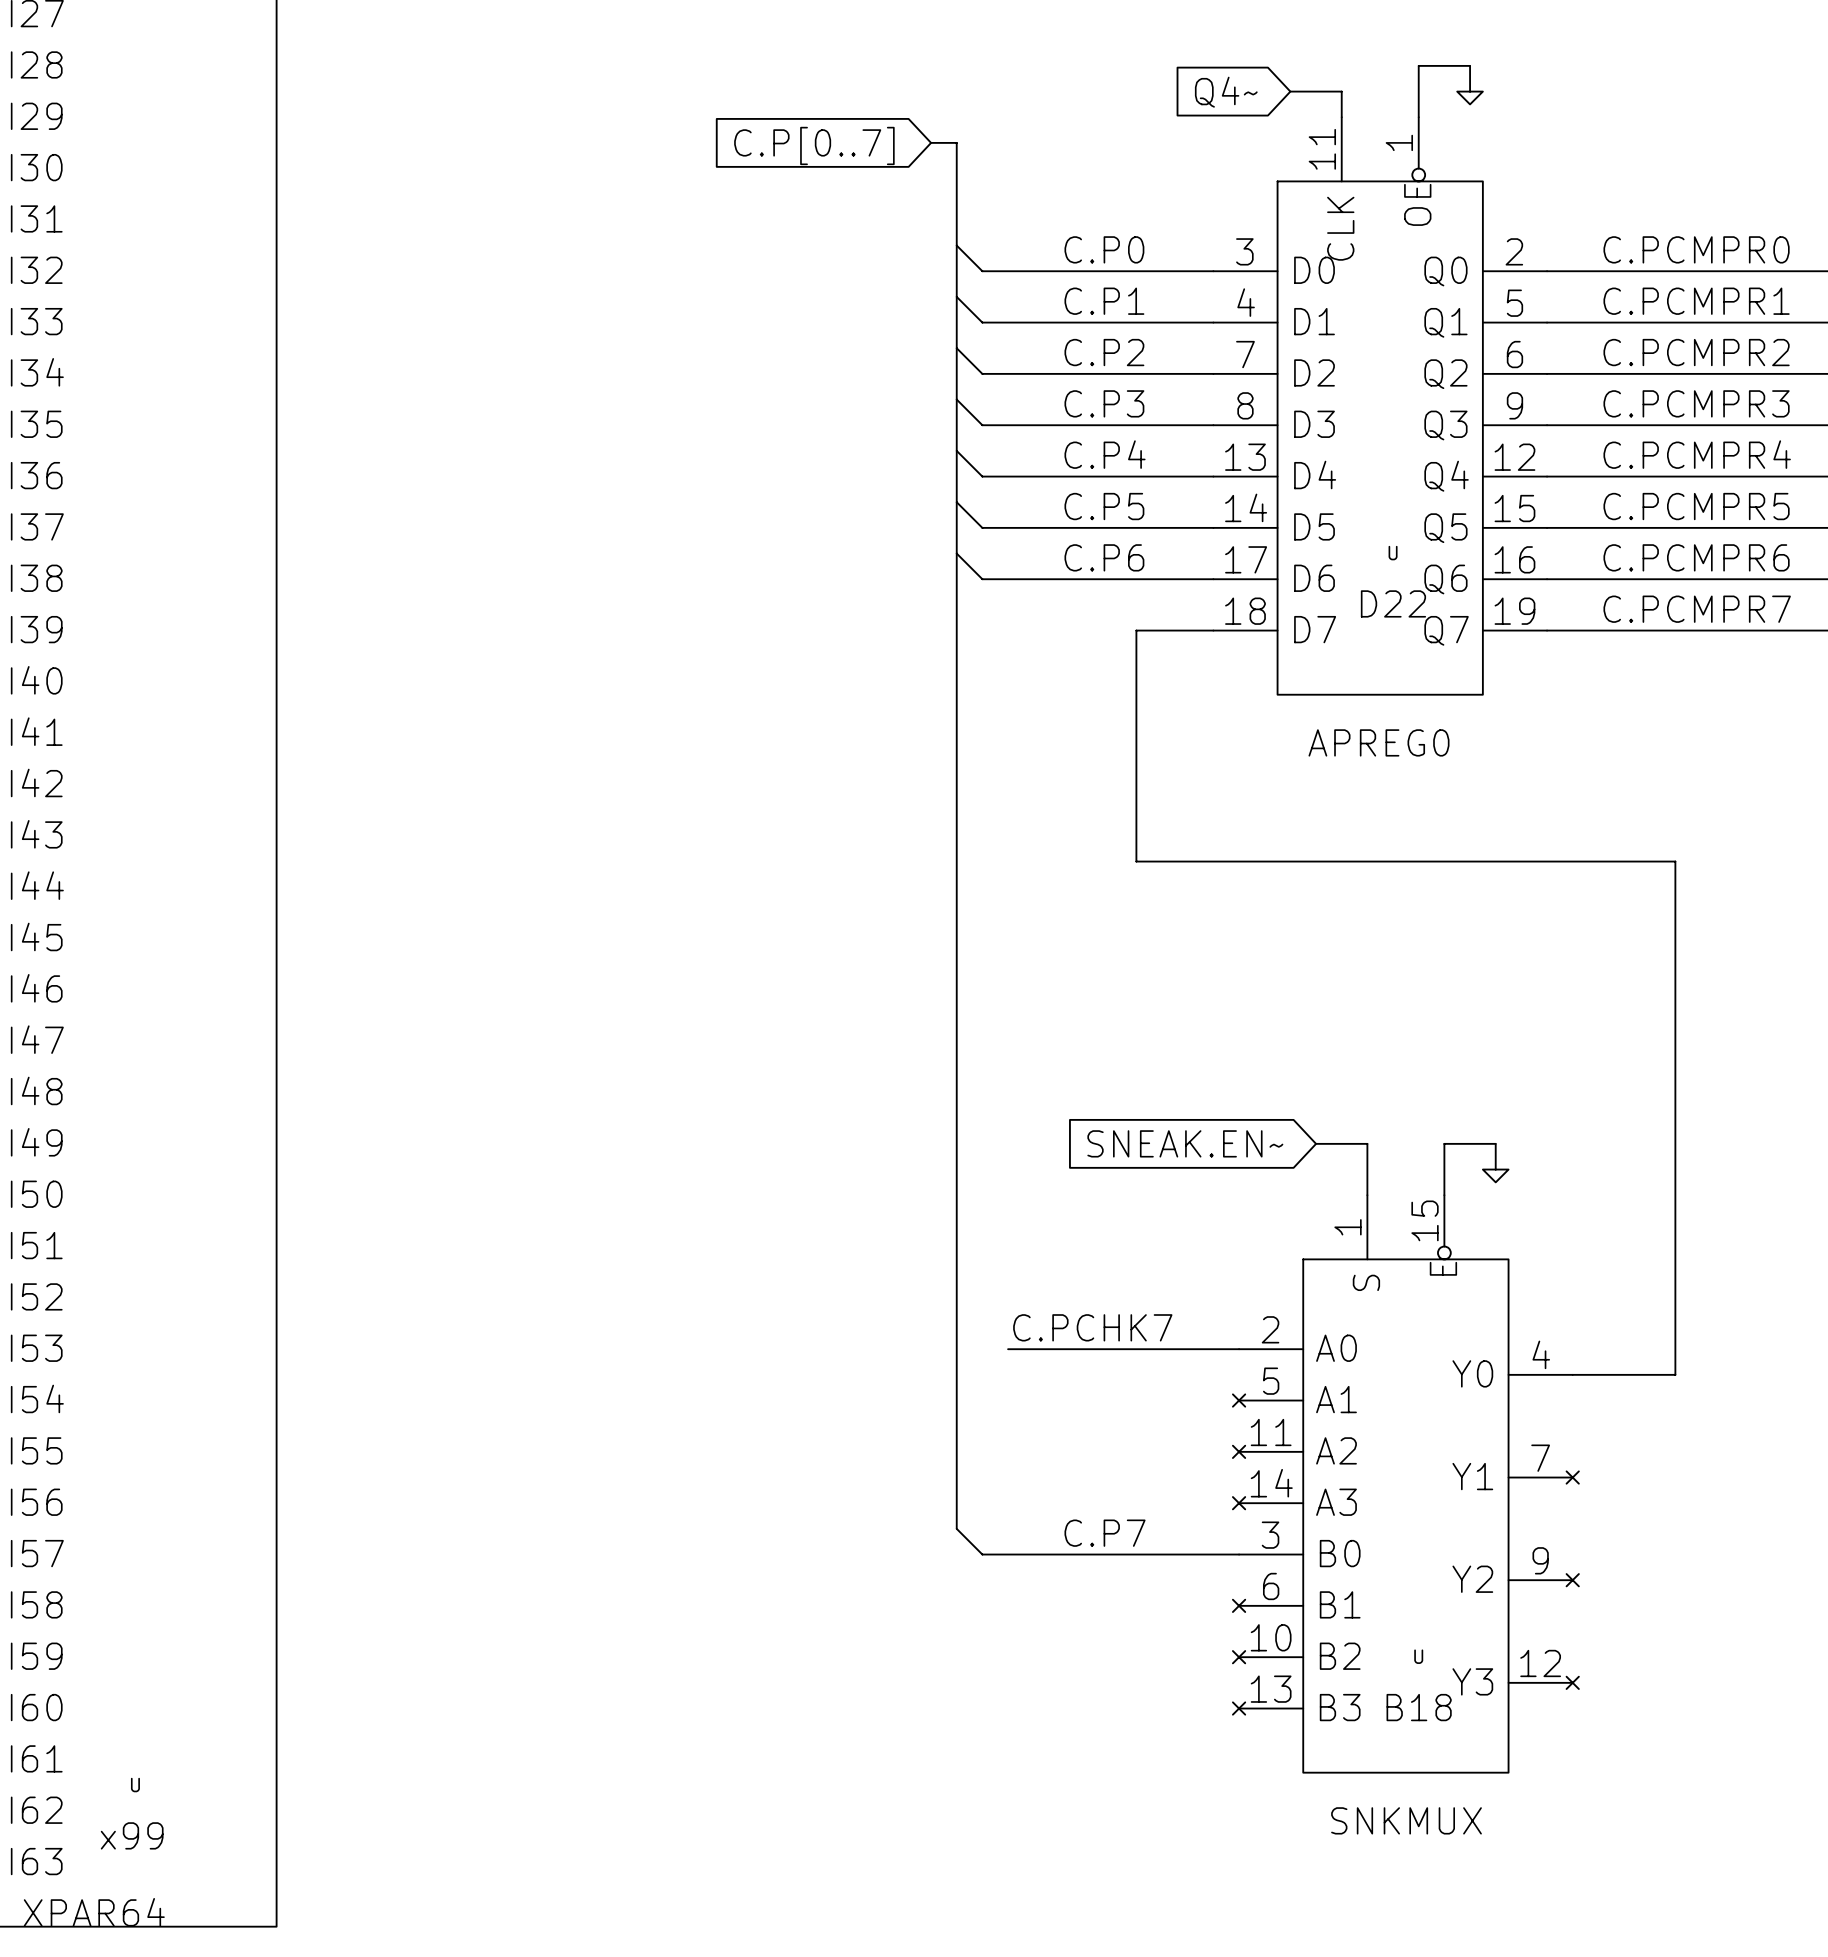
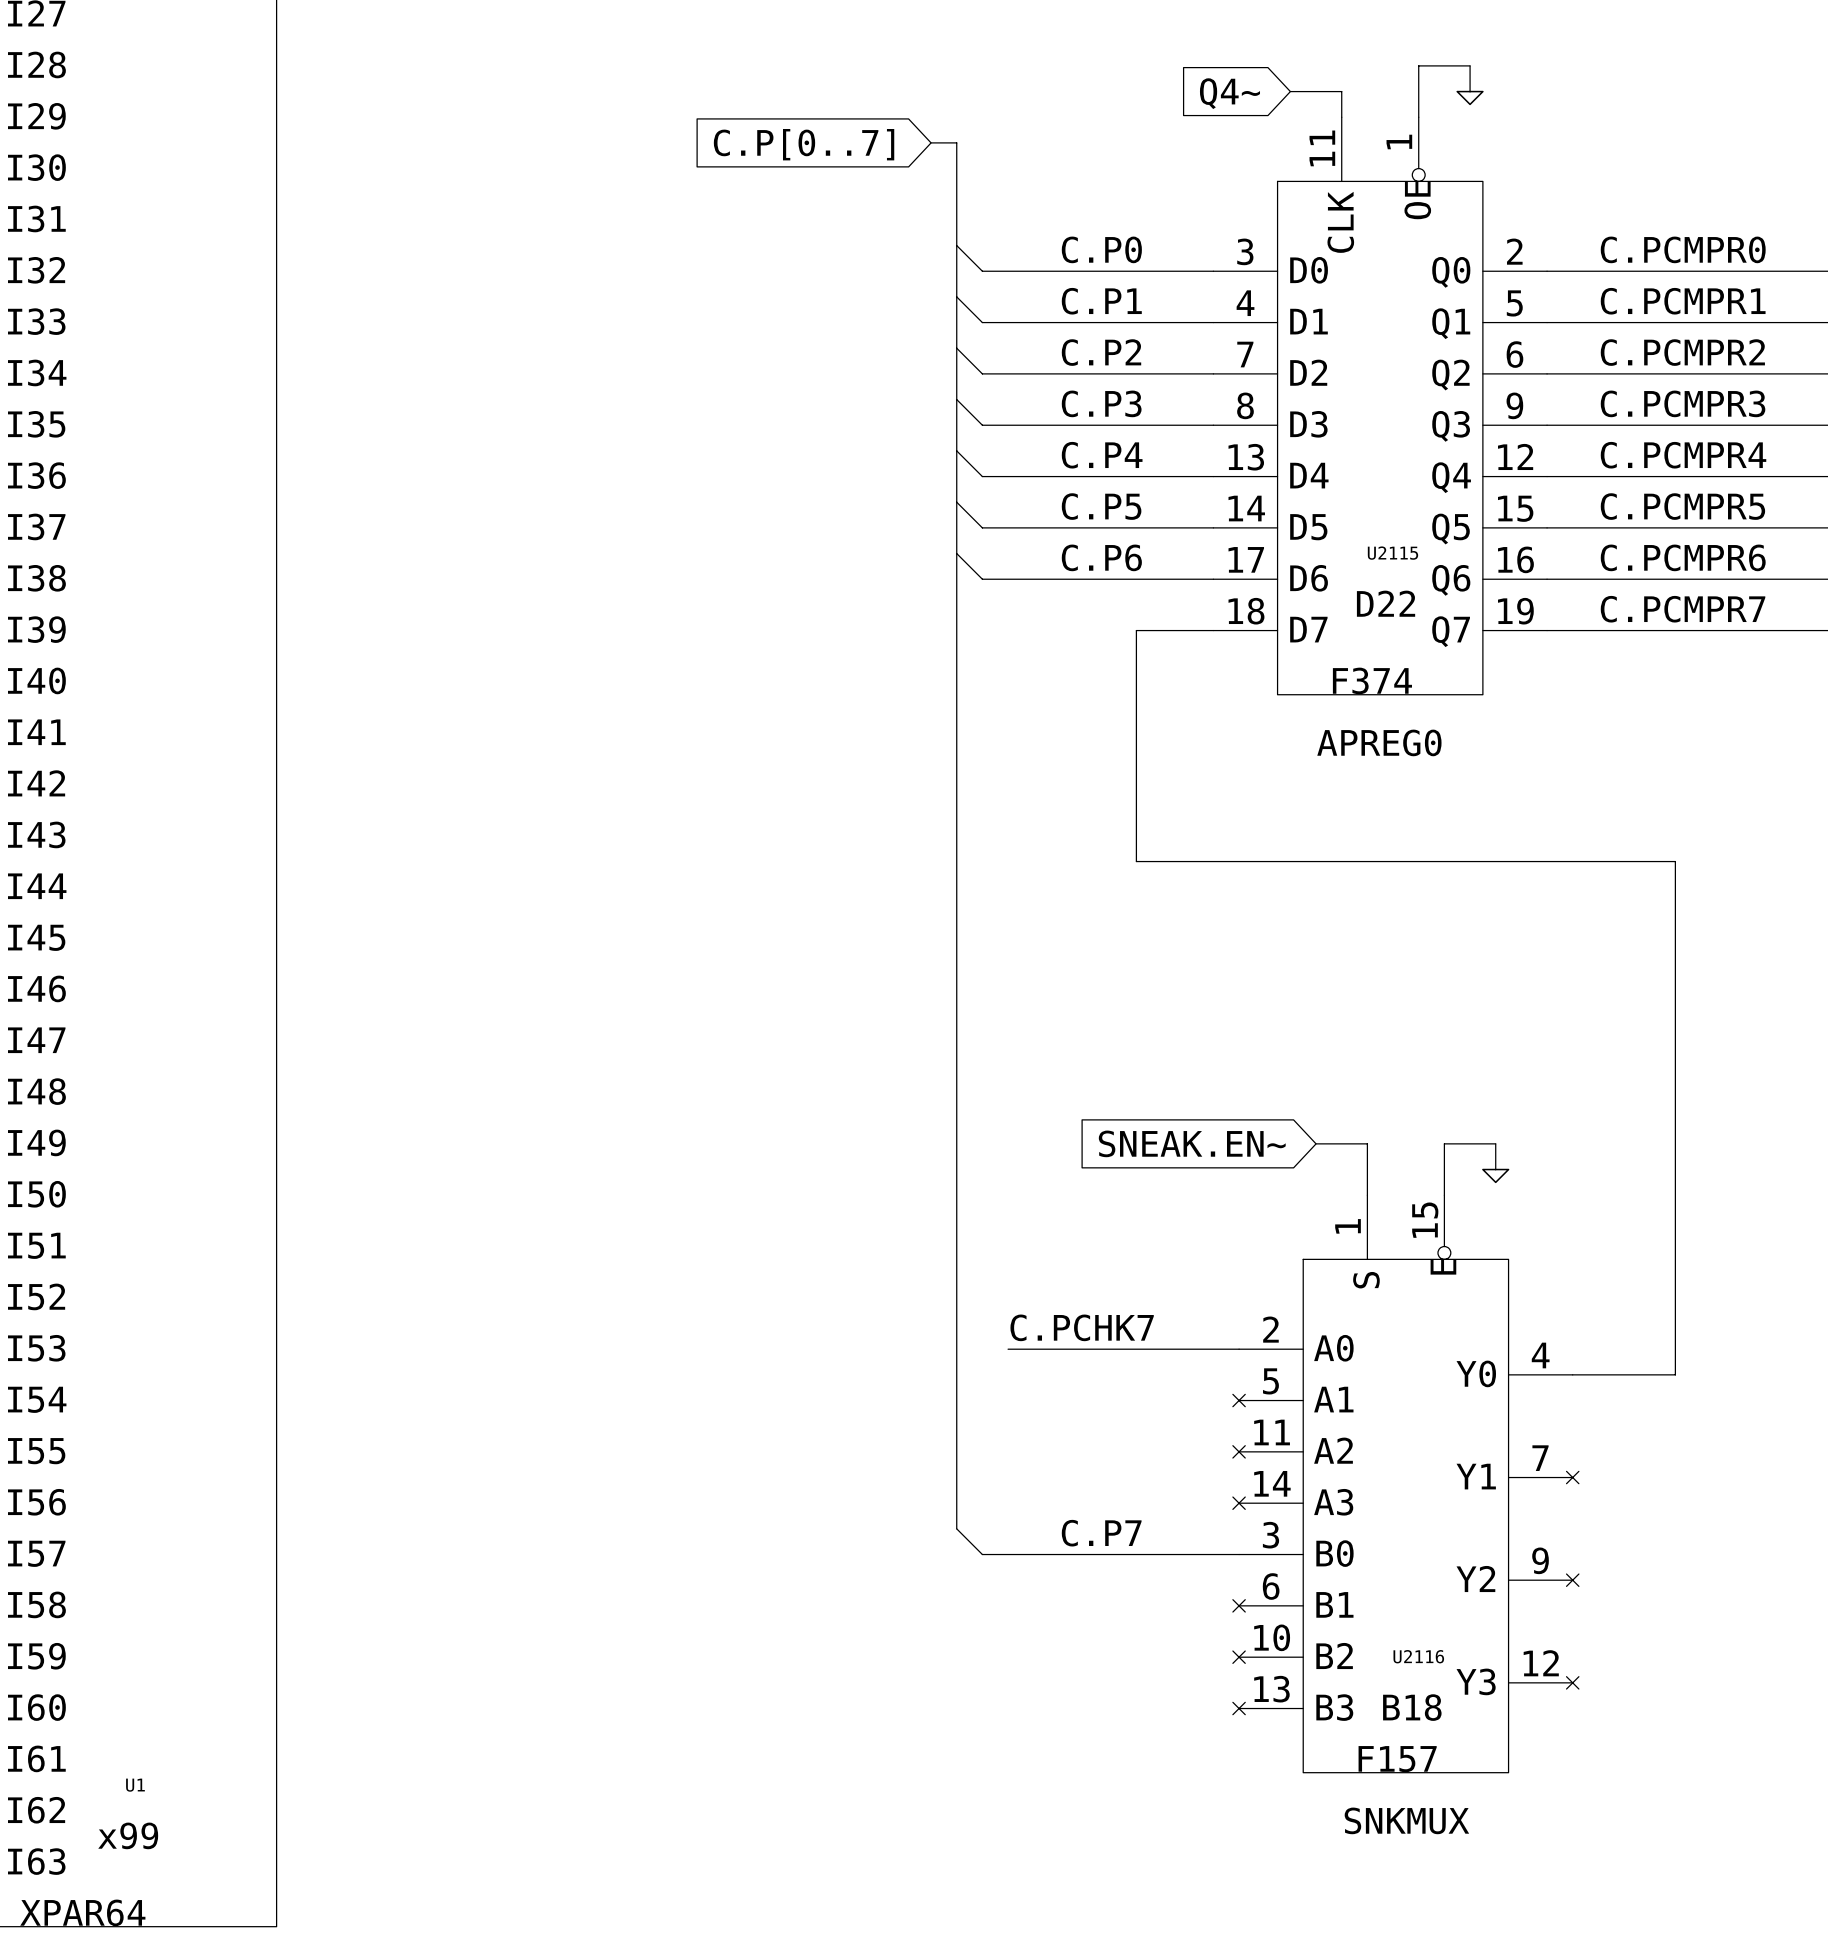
U name: U (1393, 553) -> U2115 (1392, 553)
U value: none -> F374 (1372, 680)
U name: U (1418, 1656) -> U2116 (1418, 1656)
U value: none -> F157 (1397, 1759)
U name: U (135, 1785) -> U1 (135, 1785)

